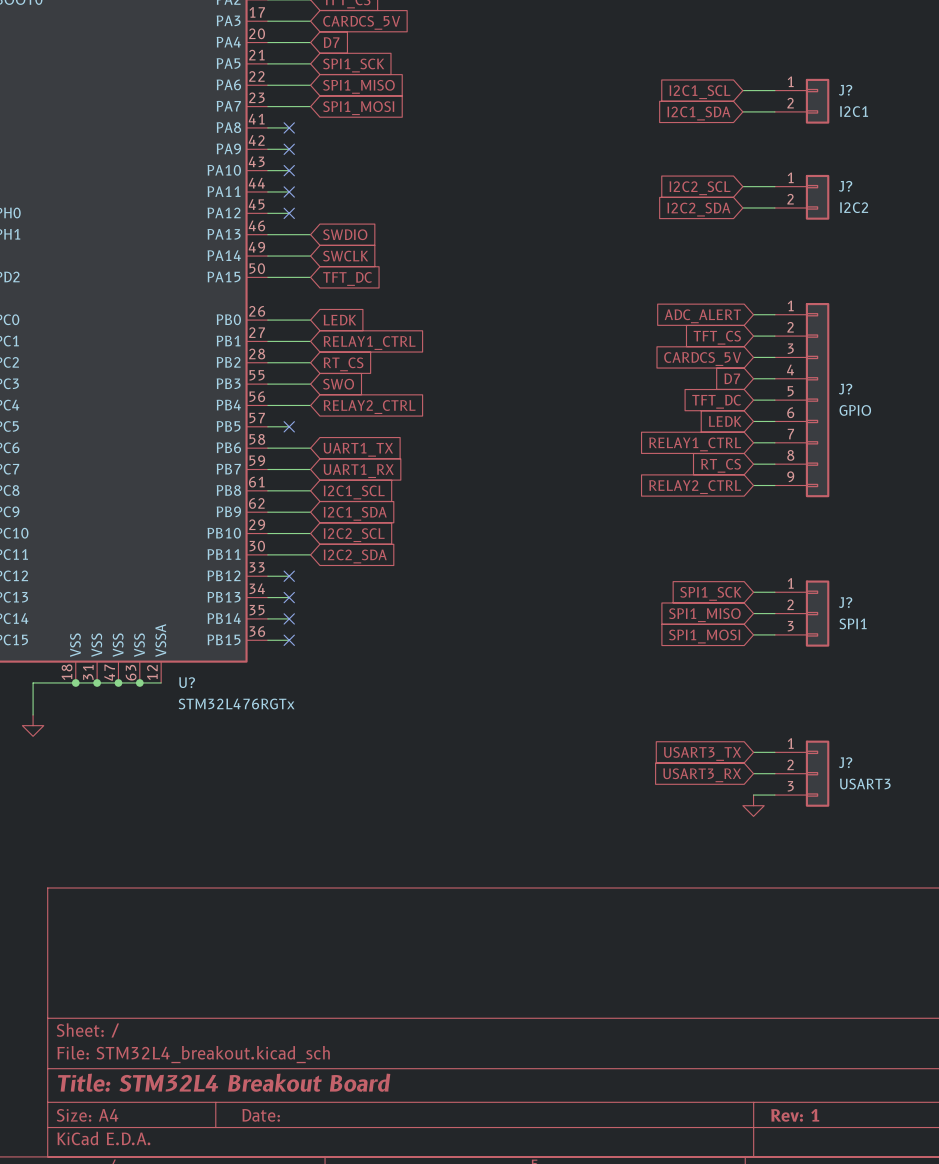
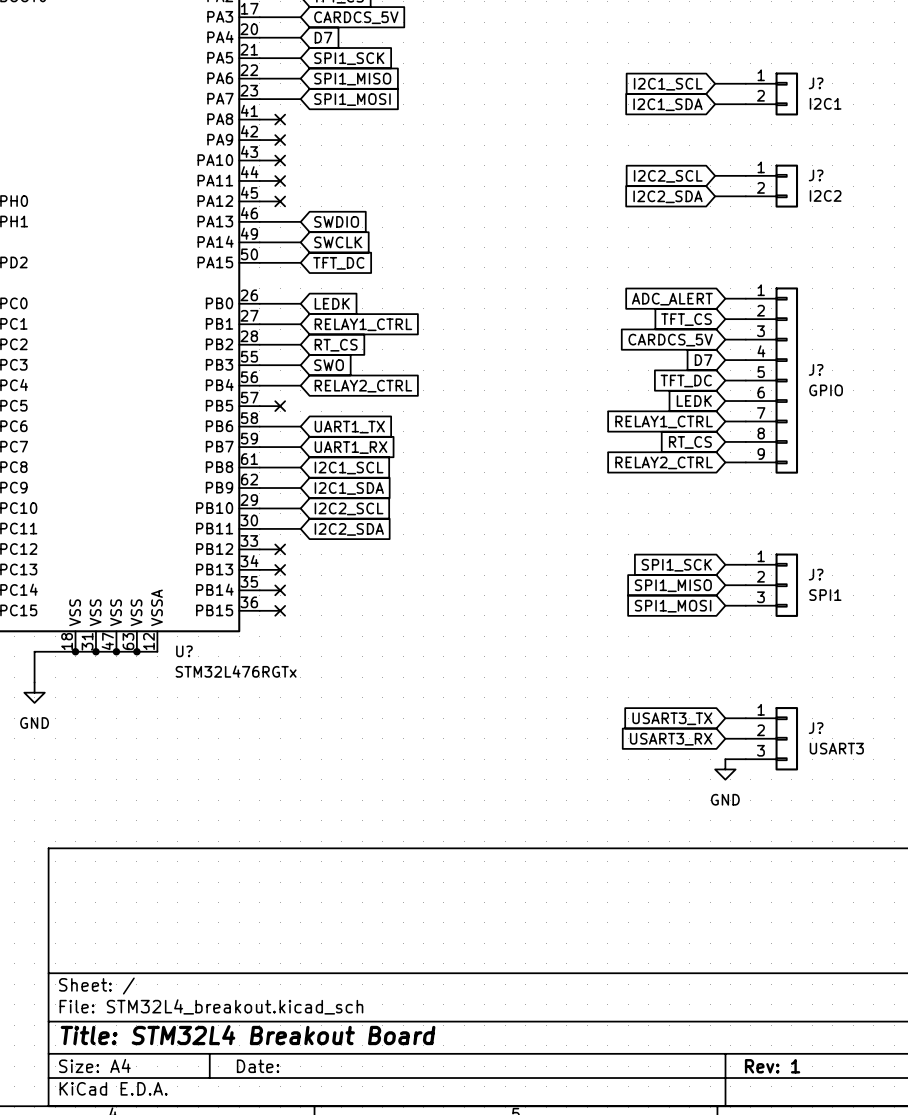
power symbol text: none -> GND (34, 723)
power symbol text: none -> GND (725, 799)

